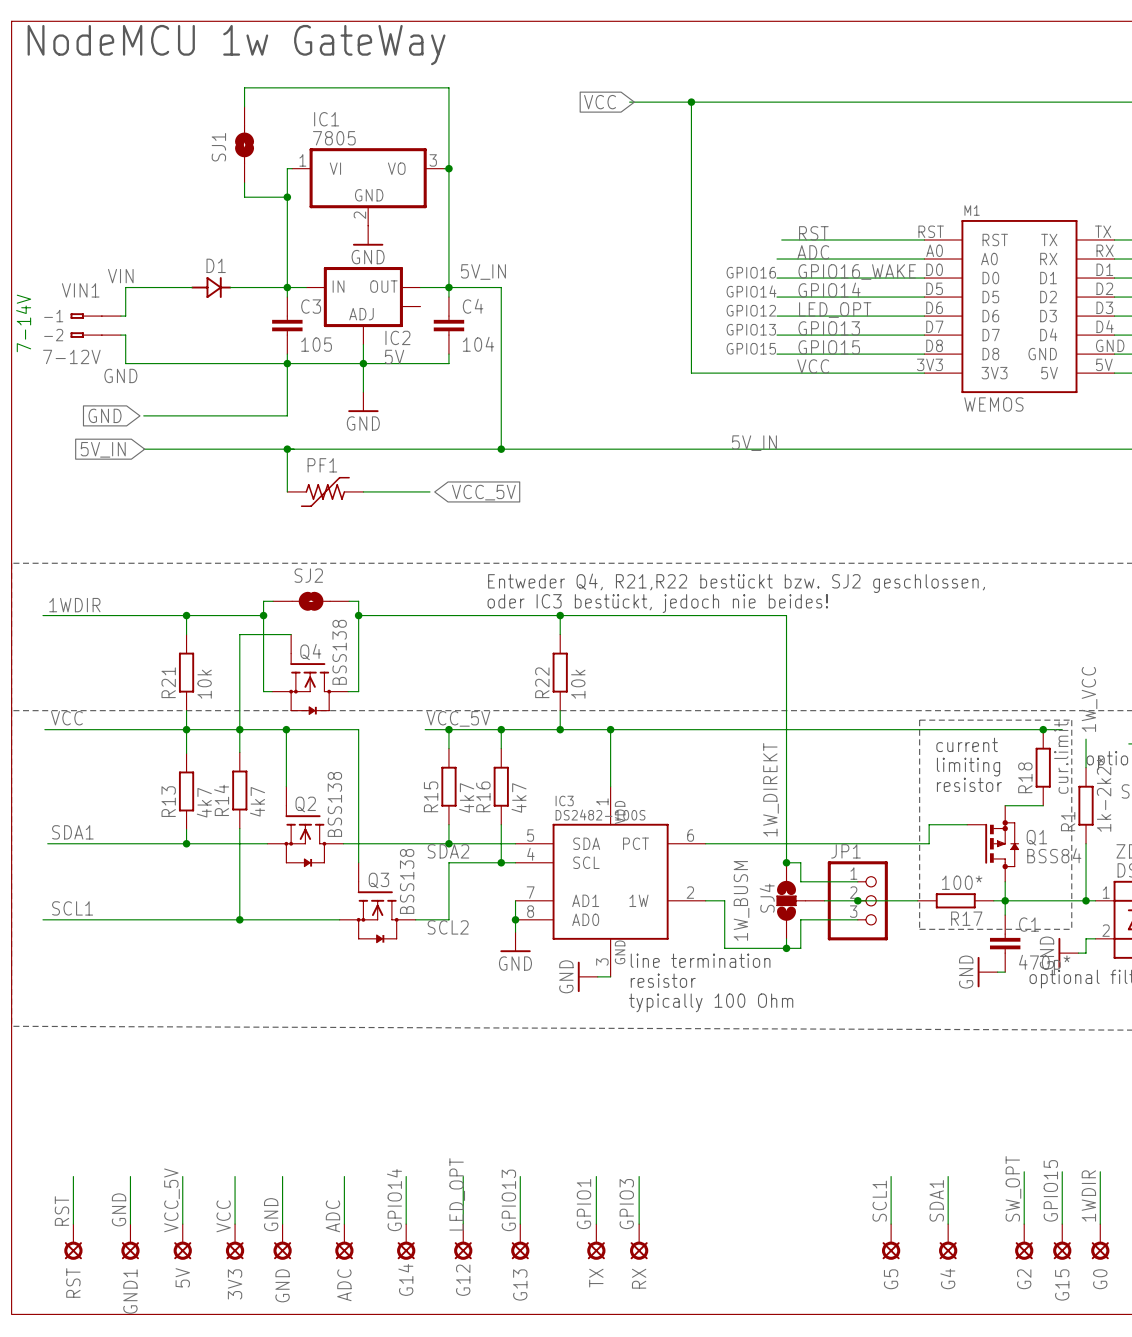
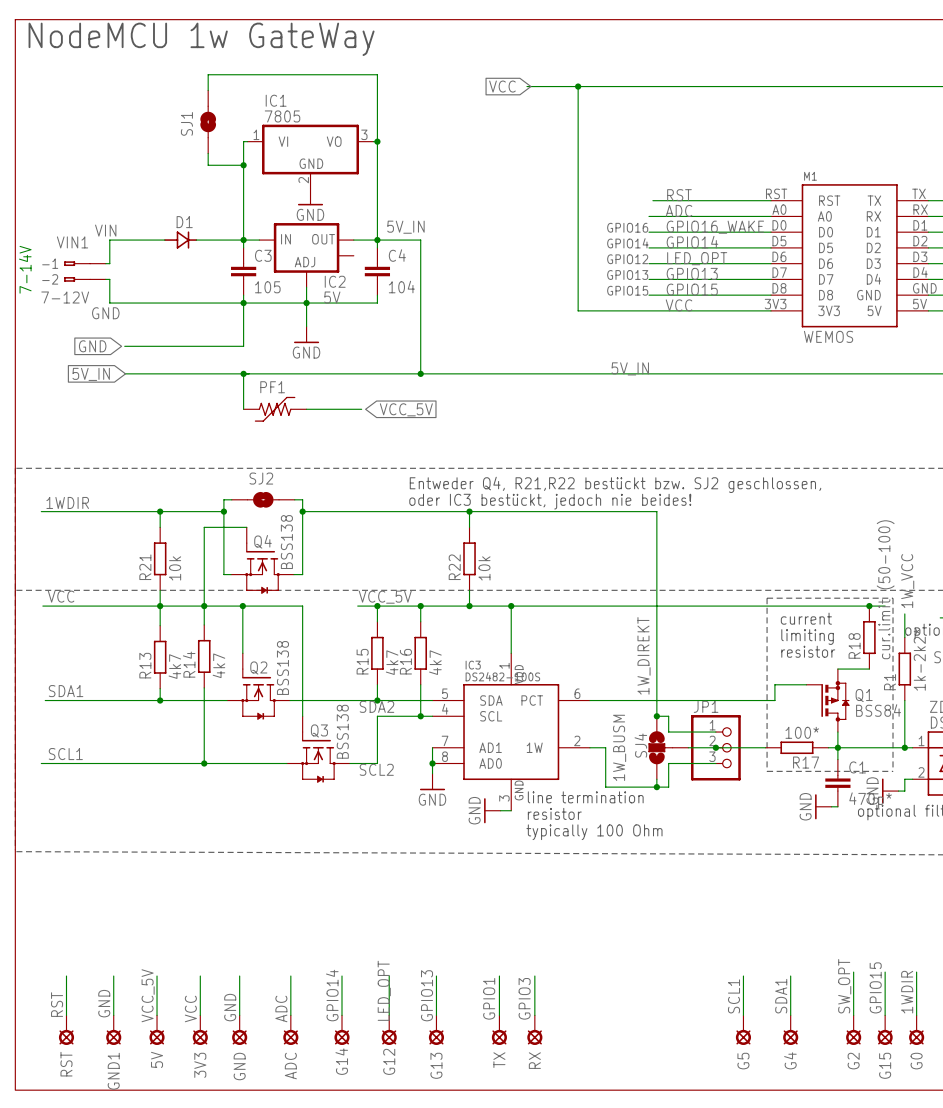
R18 value: cur.limit (1061, 757) -> cur.limit (50-100) (885, 589)

